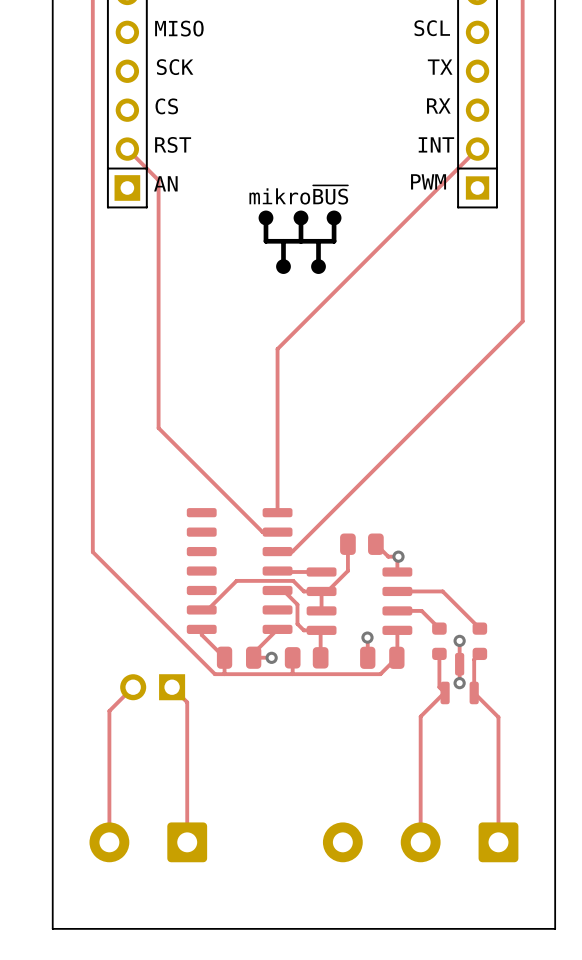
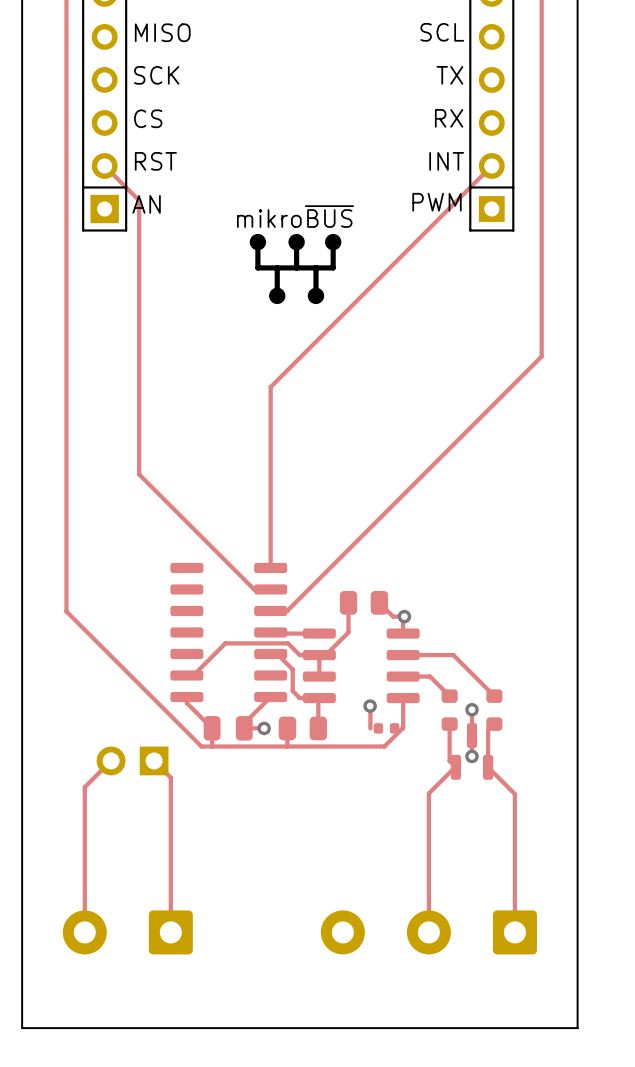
part footprint: [360, 646, 405, 669] -> [373, 723, 400, 734]

